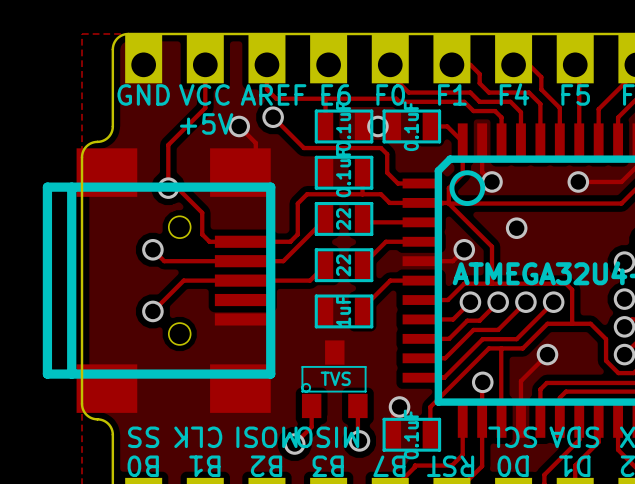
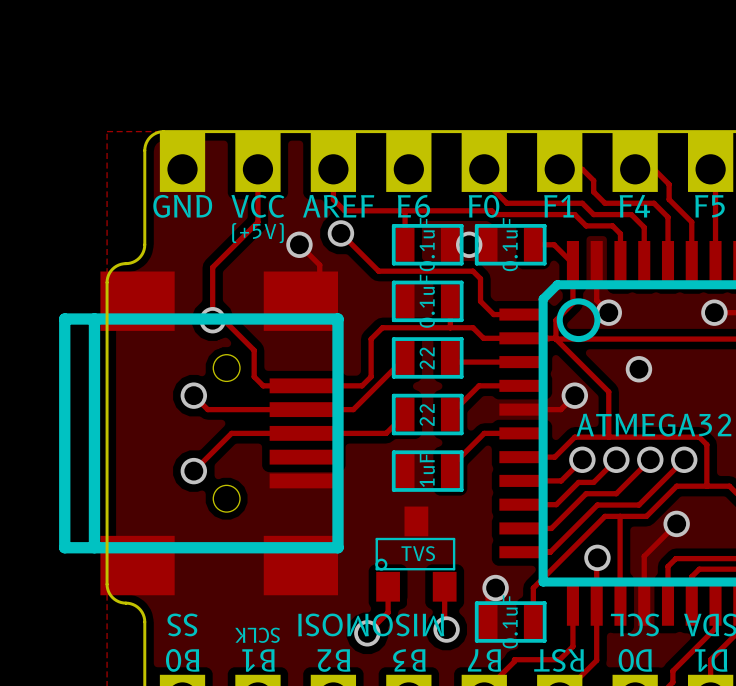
text: +5V (206, 123) -> (+5V) (257, 233)
text: CLK (198, 437) -> SCLK (257, 635)

